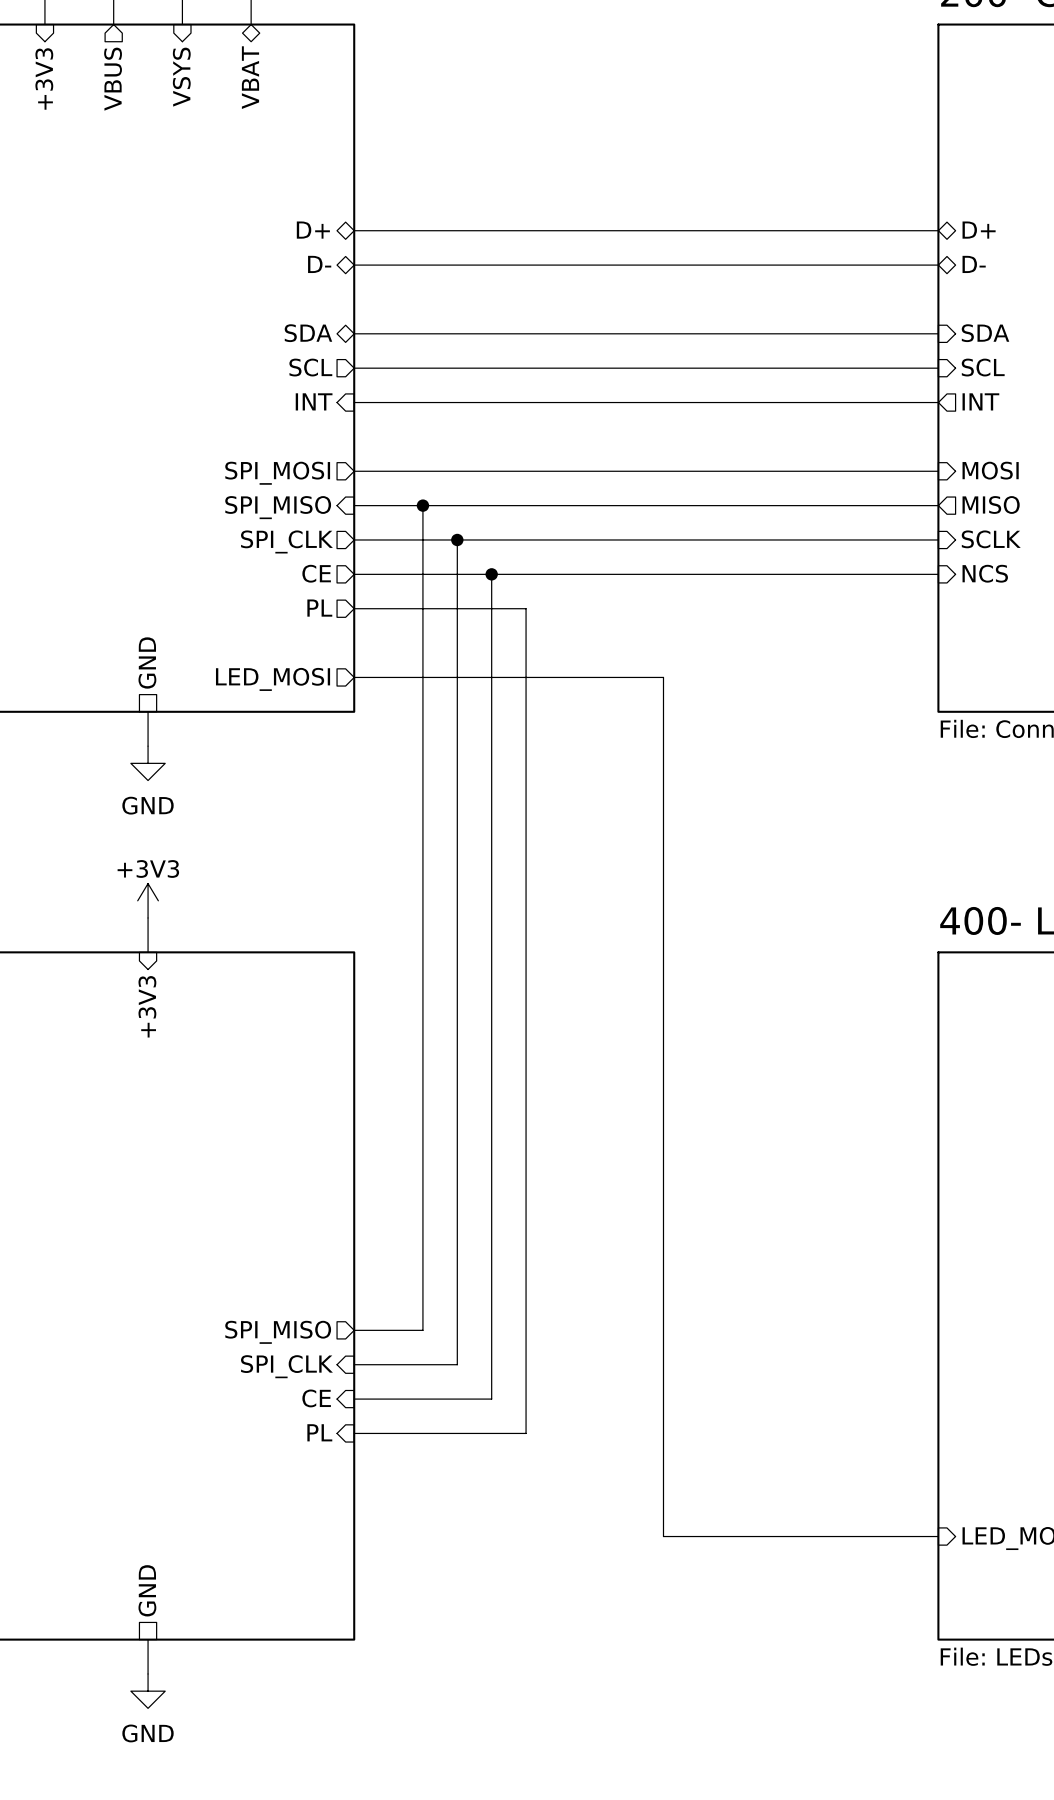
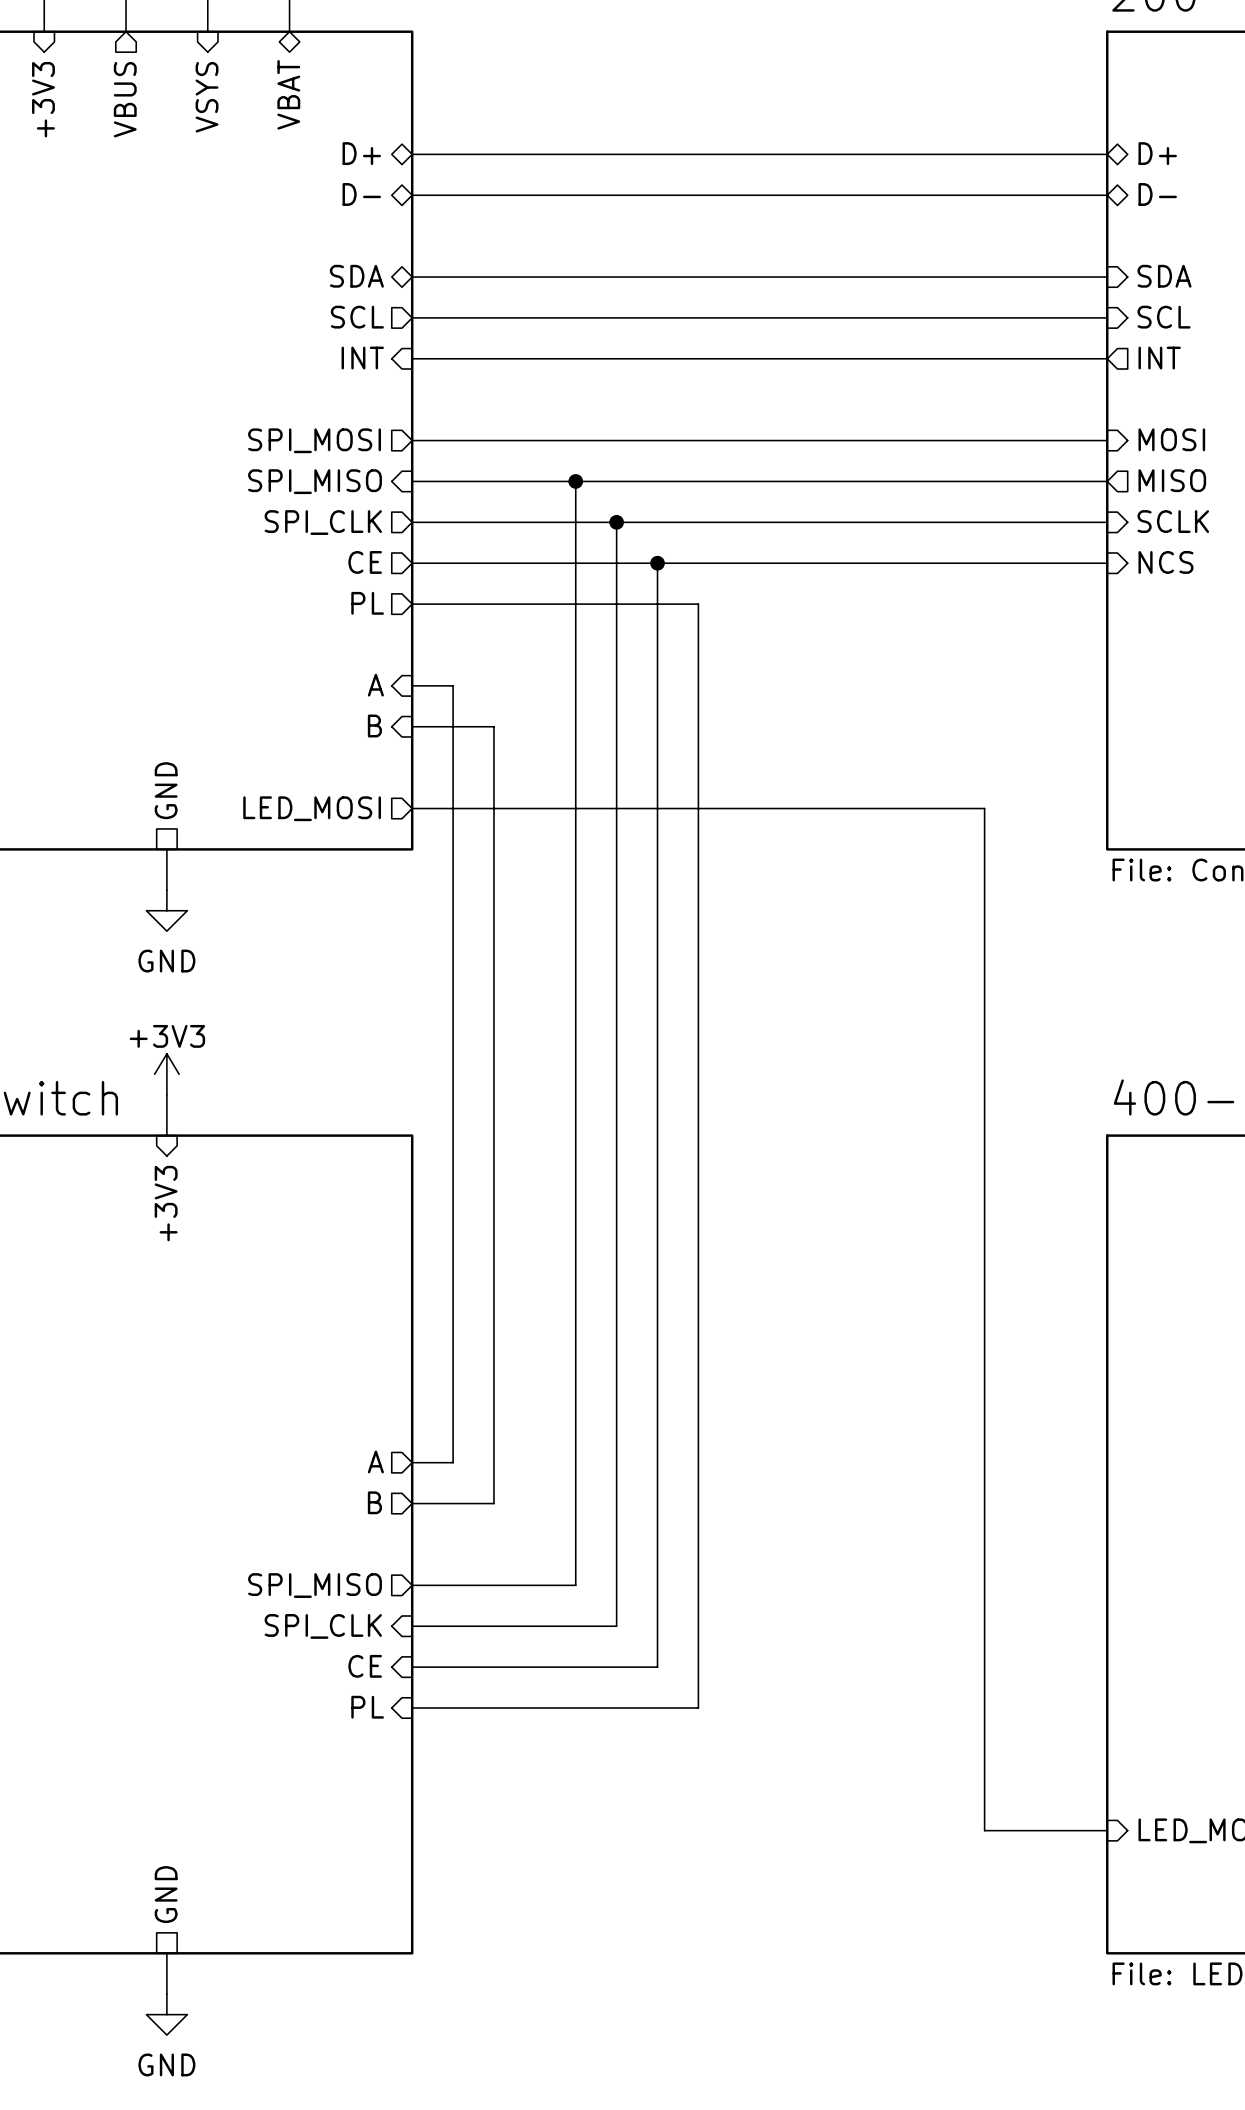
sheet pin: none -> D+ (361, 153)
sheet pin: none -> D+ (1157, 153)
wire: none -> (412, 154) (1107, 154)
sheet pin: none -> D- (361, 194)
wire: none -> (412, 195) (1107, 195)
sheet pin: none -> D- (1157, 194)
sheet pin: D+ (313, 230) -> SDA (356, 276)
sheet pin shape: bidirectional (979, 230) -> input (1164, 276)
sheet pin: D+ (979, 230) -> SDA (1164, 276)
sheet pin shape: bidirectional (319, 264) -> output (357, 317)
sheet pin: D- (319, 264) -> SCL (357, 317)
sheet pin shape: bidirectional (974, 264) -> input (1164, 317)
sheet pin: D- (974, 264) -> SCL (1164, 317)
sheet pin: none -> INT (362, 358)
sheet pin: none -> INT (1159, 358)
sheet pin: SDA (308, 333) -> none
wire: (354, 333) (938, 333) -> (412, 358) (1107, 358)
sheet pin: SDA (985, 333) -> none
sheet pin: SCL (310, 367) -> SPI_MOSI (314, 440)
sheet pin: SCL (983, 367) -> MOSI (1171, 439)
sheet pin: INT (314, 401) -> SPI_MISO (315, 481)
sheet pin: INT (980, 401) -> MISO (1172, 480)
wire: none -> (575, 481) (575, 685)
junction: none -> (575, 481)
junction: none -> (616, 522)
sheet pin: MOSI (990, 470) -> NCS (1165, 562)
wire: none -> (657, 563) (657, 1667) (575, 1667)
junction: none -> (657, 563)
sheet pin: SPI_MOSI (277, 473) -> CE (365, 562)
sheet pin: MISO (991, 504) -> none
wire: (422, 505) (422, 608) (526, 608) -> (616, 522) (616, 726)
junction: (422, 505) -> none
wire: (594, 505) (938, 505) -> (698, 604) (698, 1707) (616, 1707)
sheet pin shape: input (278, 507) -> output (367, 603)
sheet pin: SPI_MISO (278, 507) -> PL (367, 603)
wire: (354, 539) (938, 539) -> (412, 522) (1107, 522)
wire: (457, 539) (457, 1364) -> none
junction: (457, 539) -> none
sheet pin position: SCLK (991, 539) -> SCLK (1173, 521)
sheet pin position: SPI_CLK (286, 541) -> SPI_CLK (323, 522)
sheet pin shape: output (316, 573) -> input (375, 685)
sheet pin: CE (316, 573) -> A (375, 685)
sheet pin: NCS (985, 573) -> none
wire: (388, 574) (938, 574) -> (453, 685) (453, 1462) (412, 1462)
junction: (491, 574) -> none
sheet pin shape: output (319, 608) -> input (374, 725)
sheet pin: PL (319, 608) -> B (374, 725)
wire: (663, 677) (663, 1536) (835, 1536) -> (780, 808) (984, 808) (984, 1830)
sheet pin: none -> A (375, 1461)
sheet pin: none -> B (374, 1502)
wire: (422, 1261) (422, 1330) -> (493, 1503) (412, 1503)
wire: (491, 1330) (491, 1399) -> (575, 1585) (493, 1585)
wire: (526, 1364) (526, 1433) -> (616, 1626) (534, 1626)

